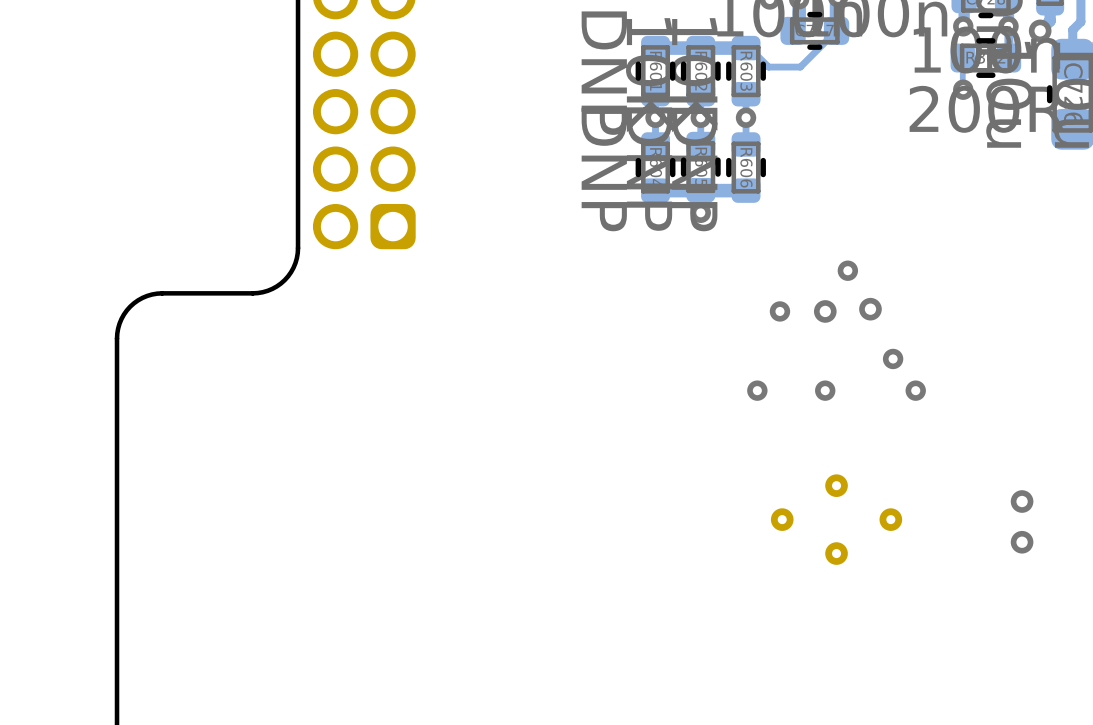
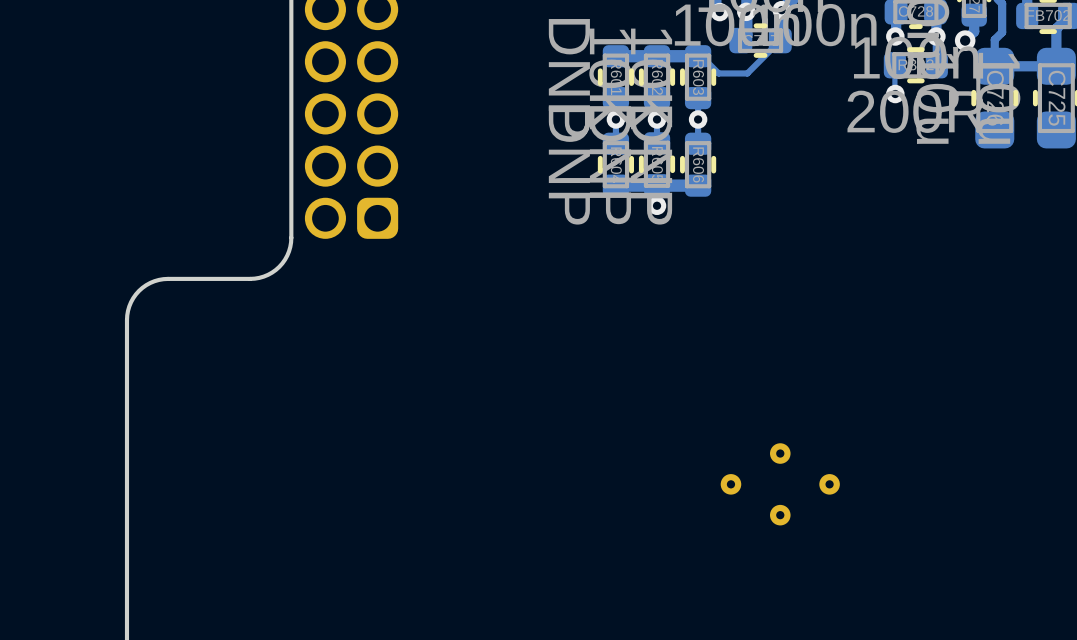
via: (847, 270) -> none
via: (870, 309) -> none
via: (779, 311) -> none
via: (825, 311) -> none
via: (893, 358) -> none
via: (757, 390) -> none
via: (825, 390) -> none
via: (915, 390) -> none
via: (1022, 501) -> none
via: (1022, 542) -> none

